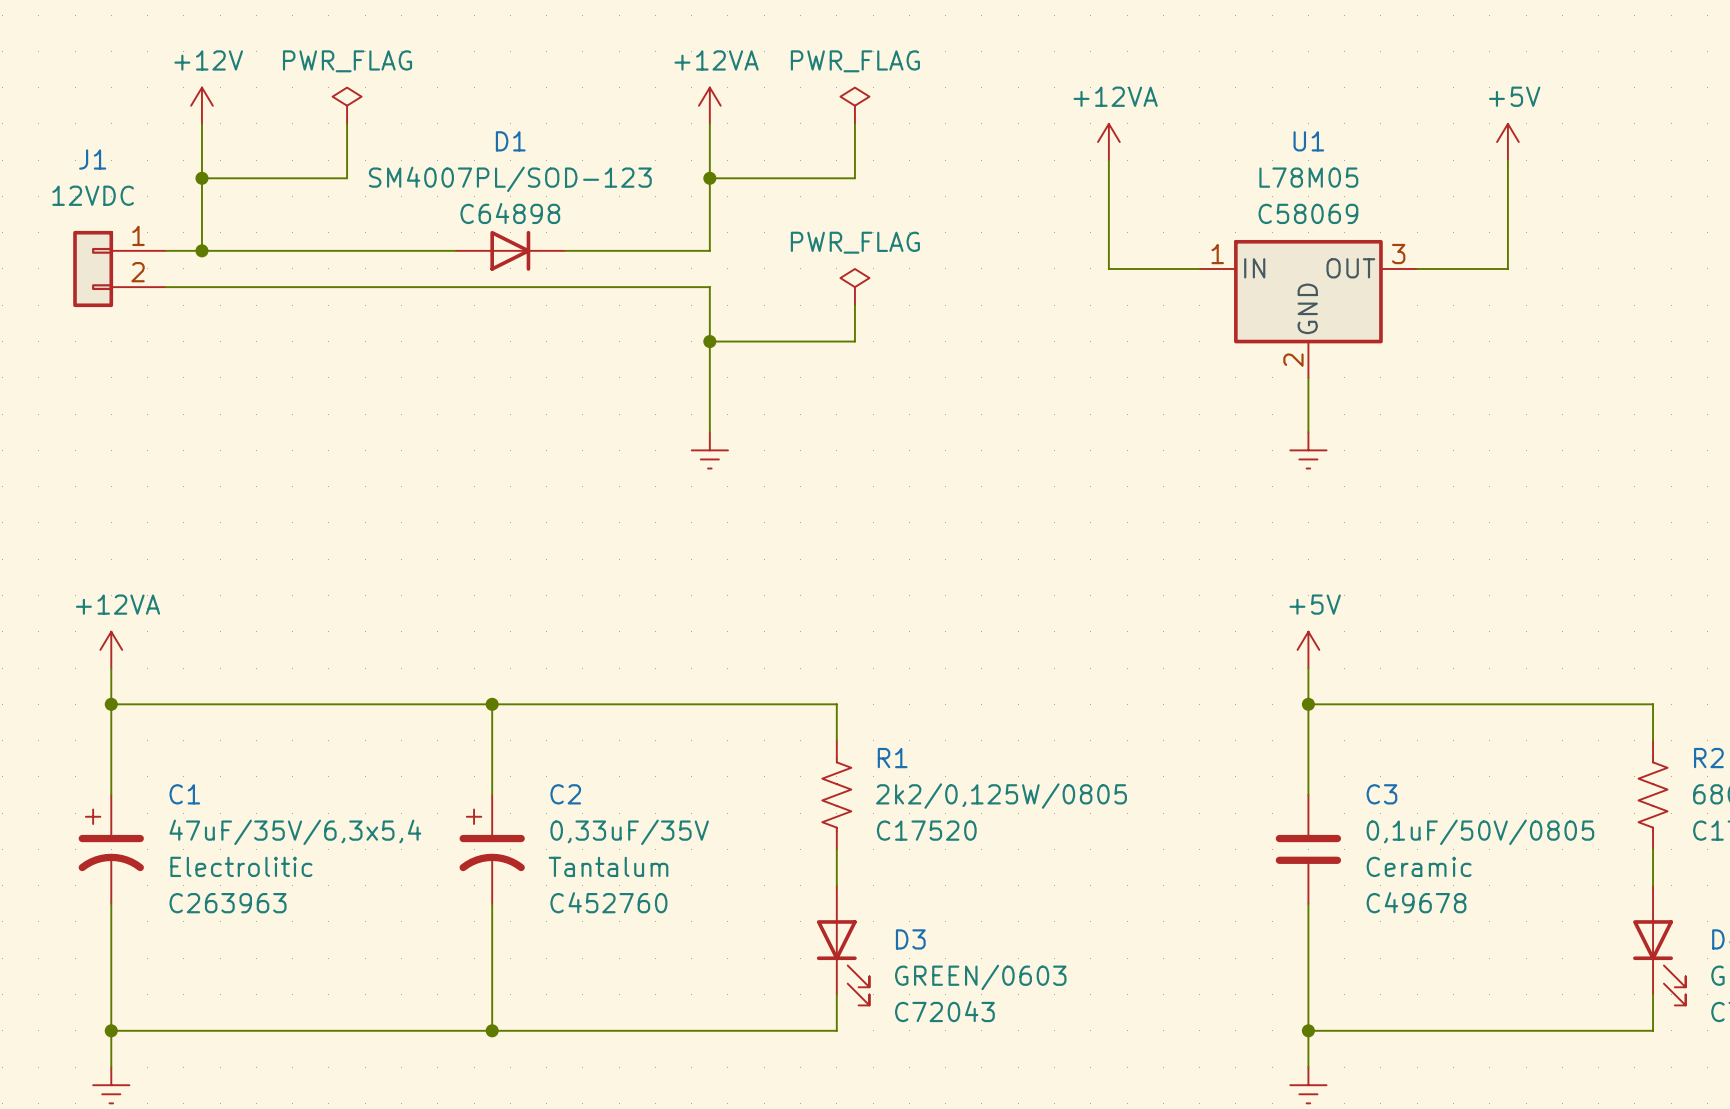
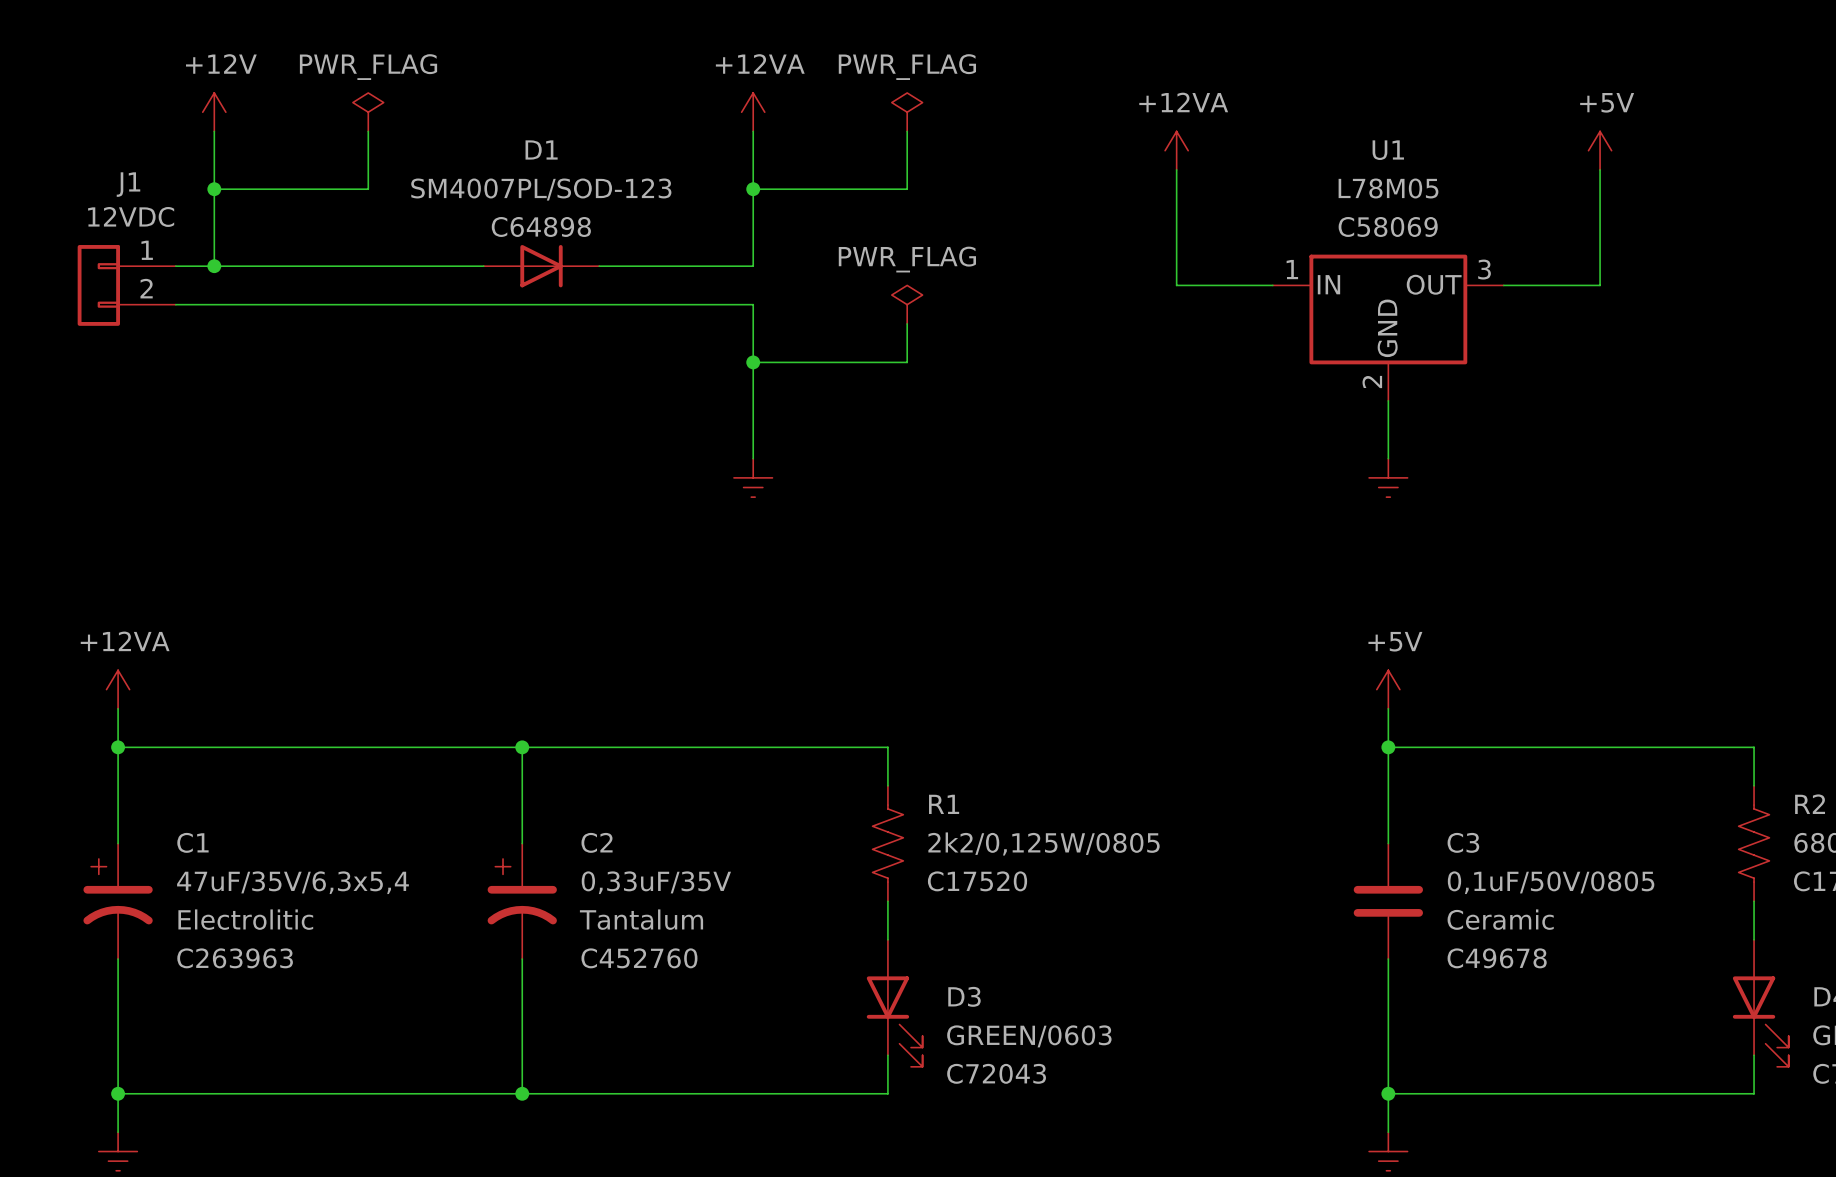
J1 name position: J1 (92, 159) -> J1 (128, 184)
J1 value position: 12VDC (93, 195) -> 12VDC (131, 216)

